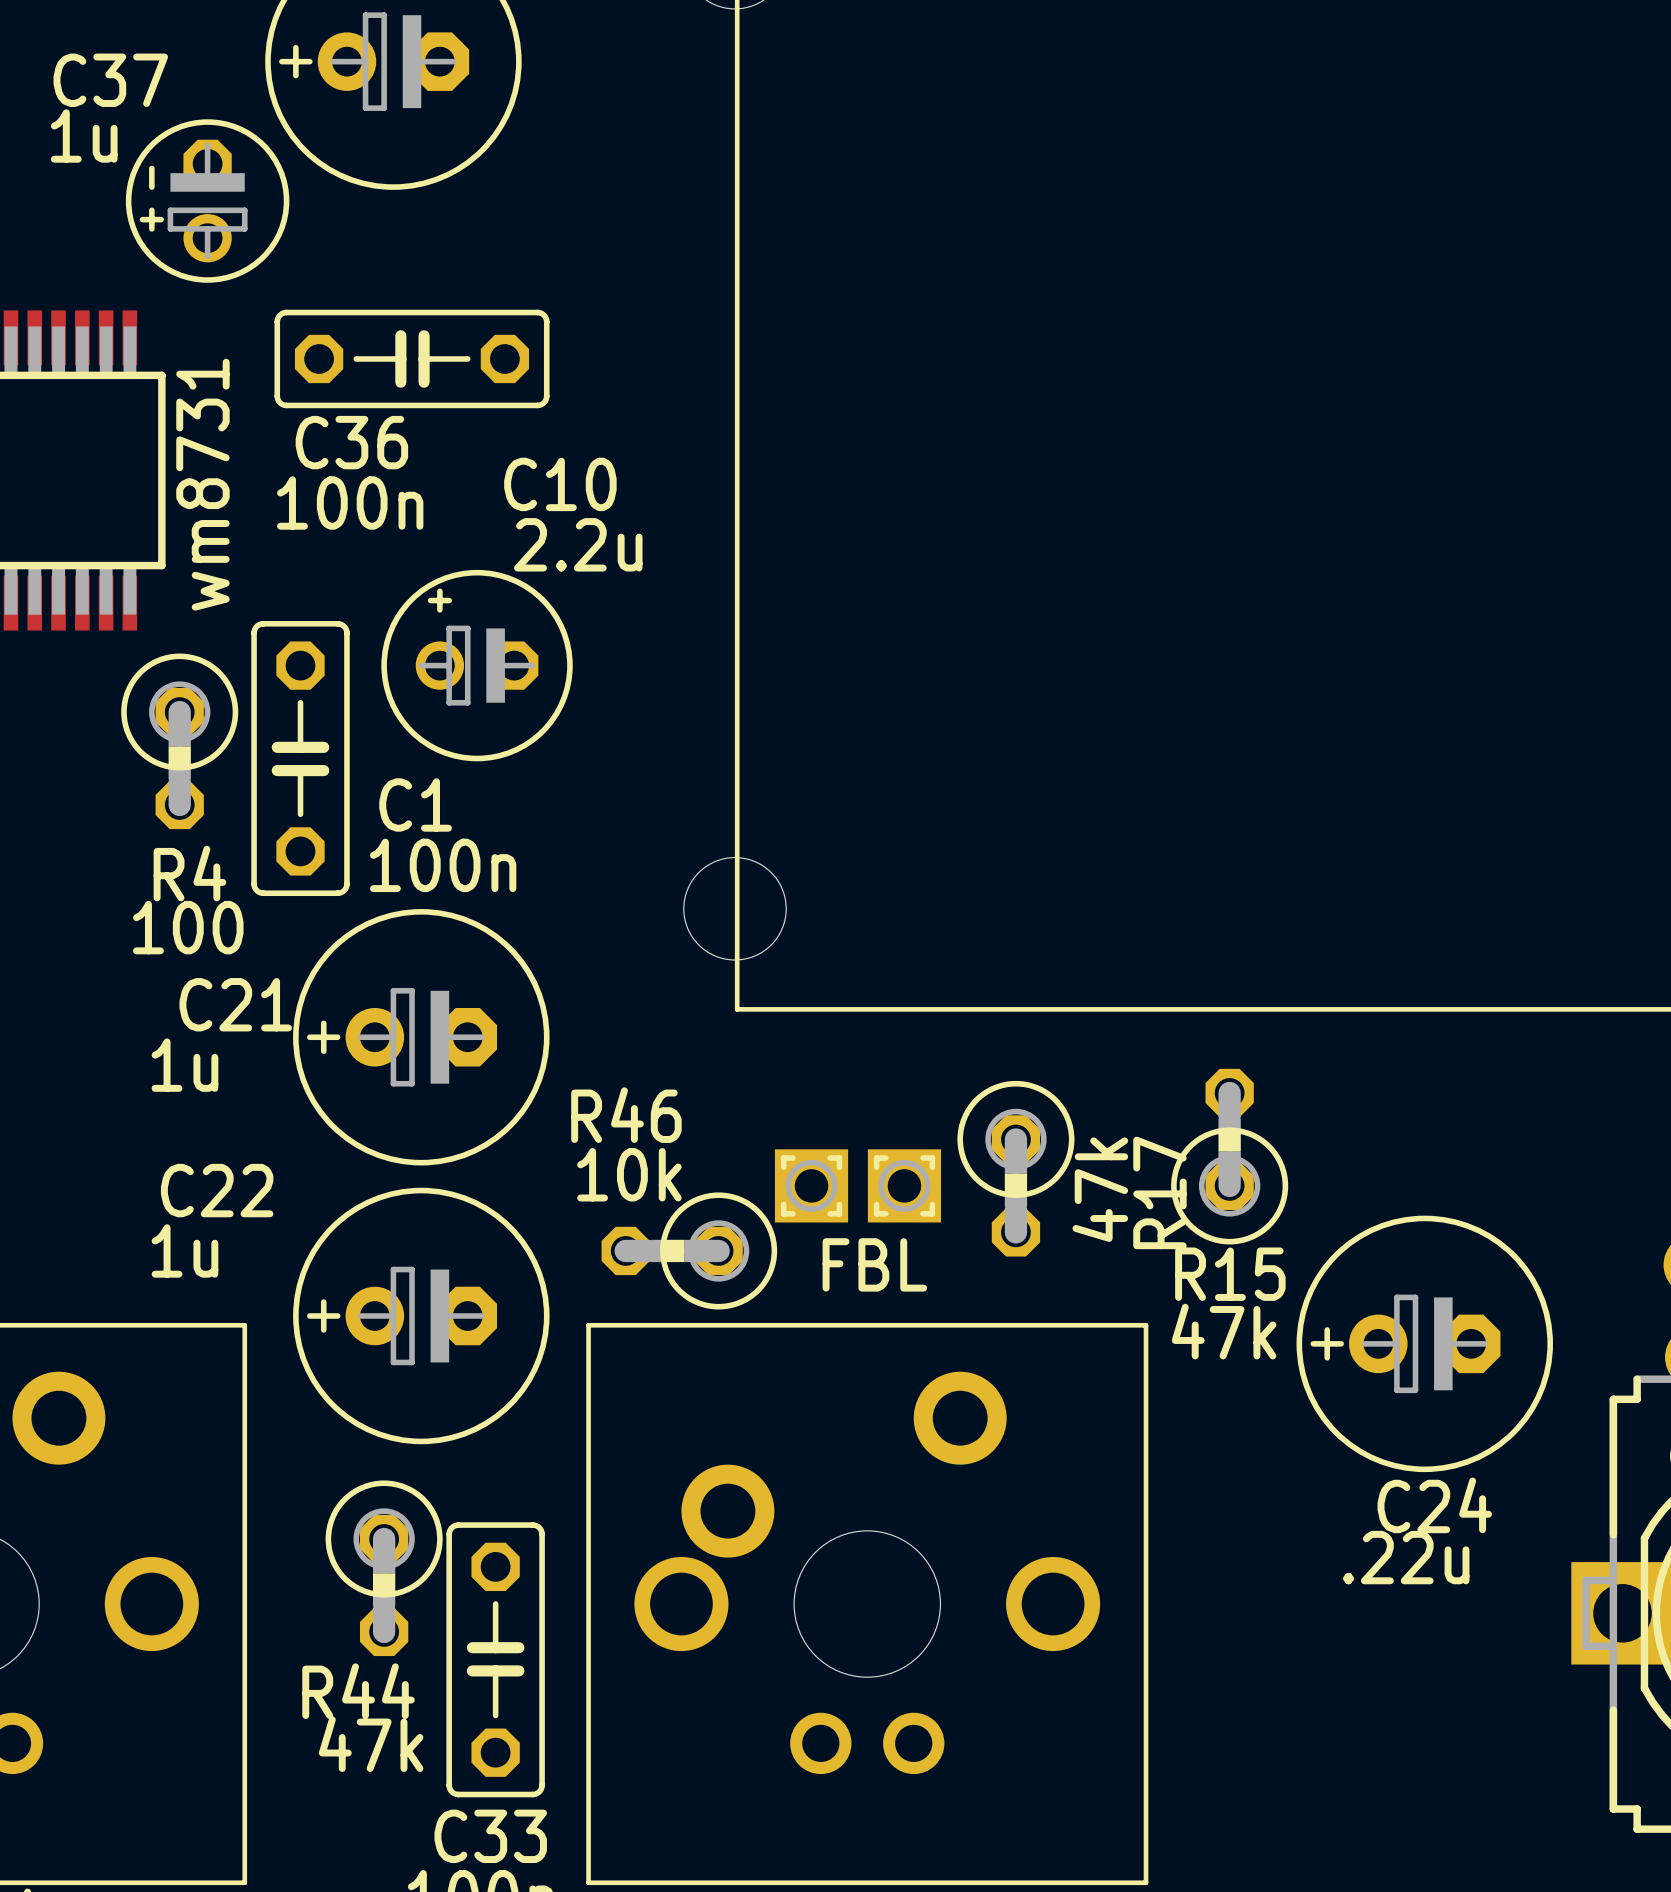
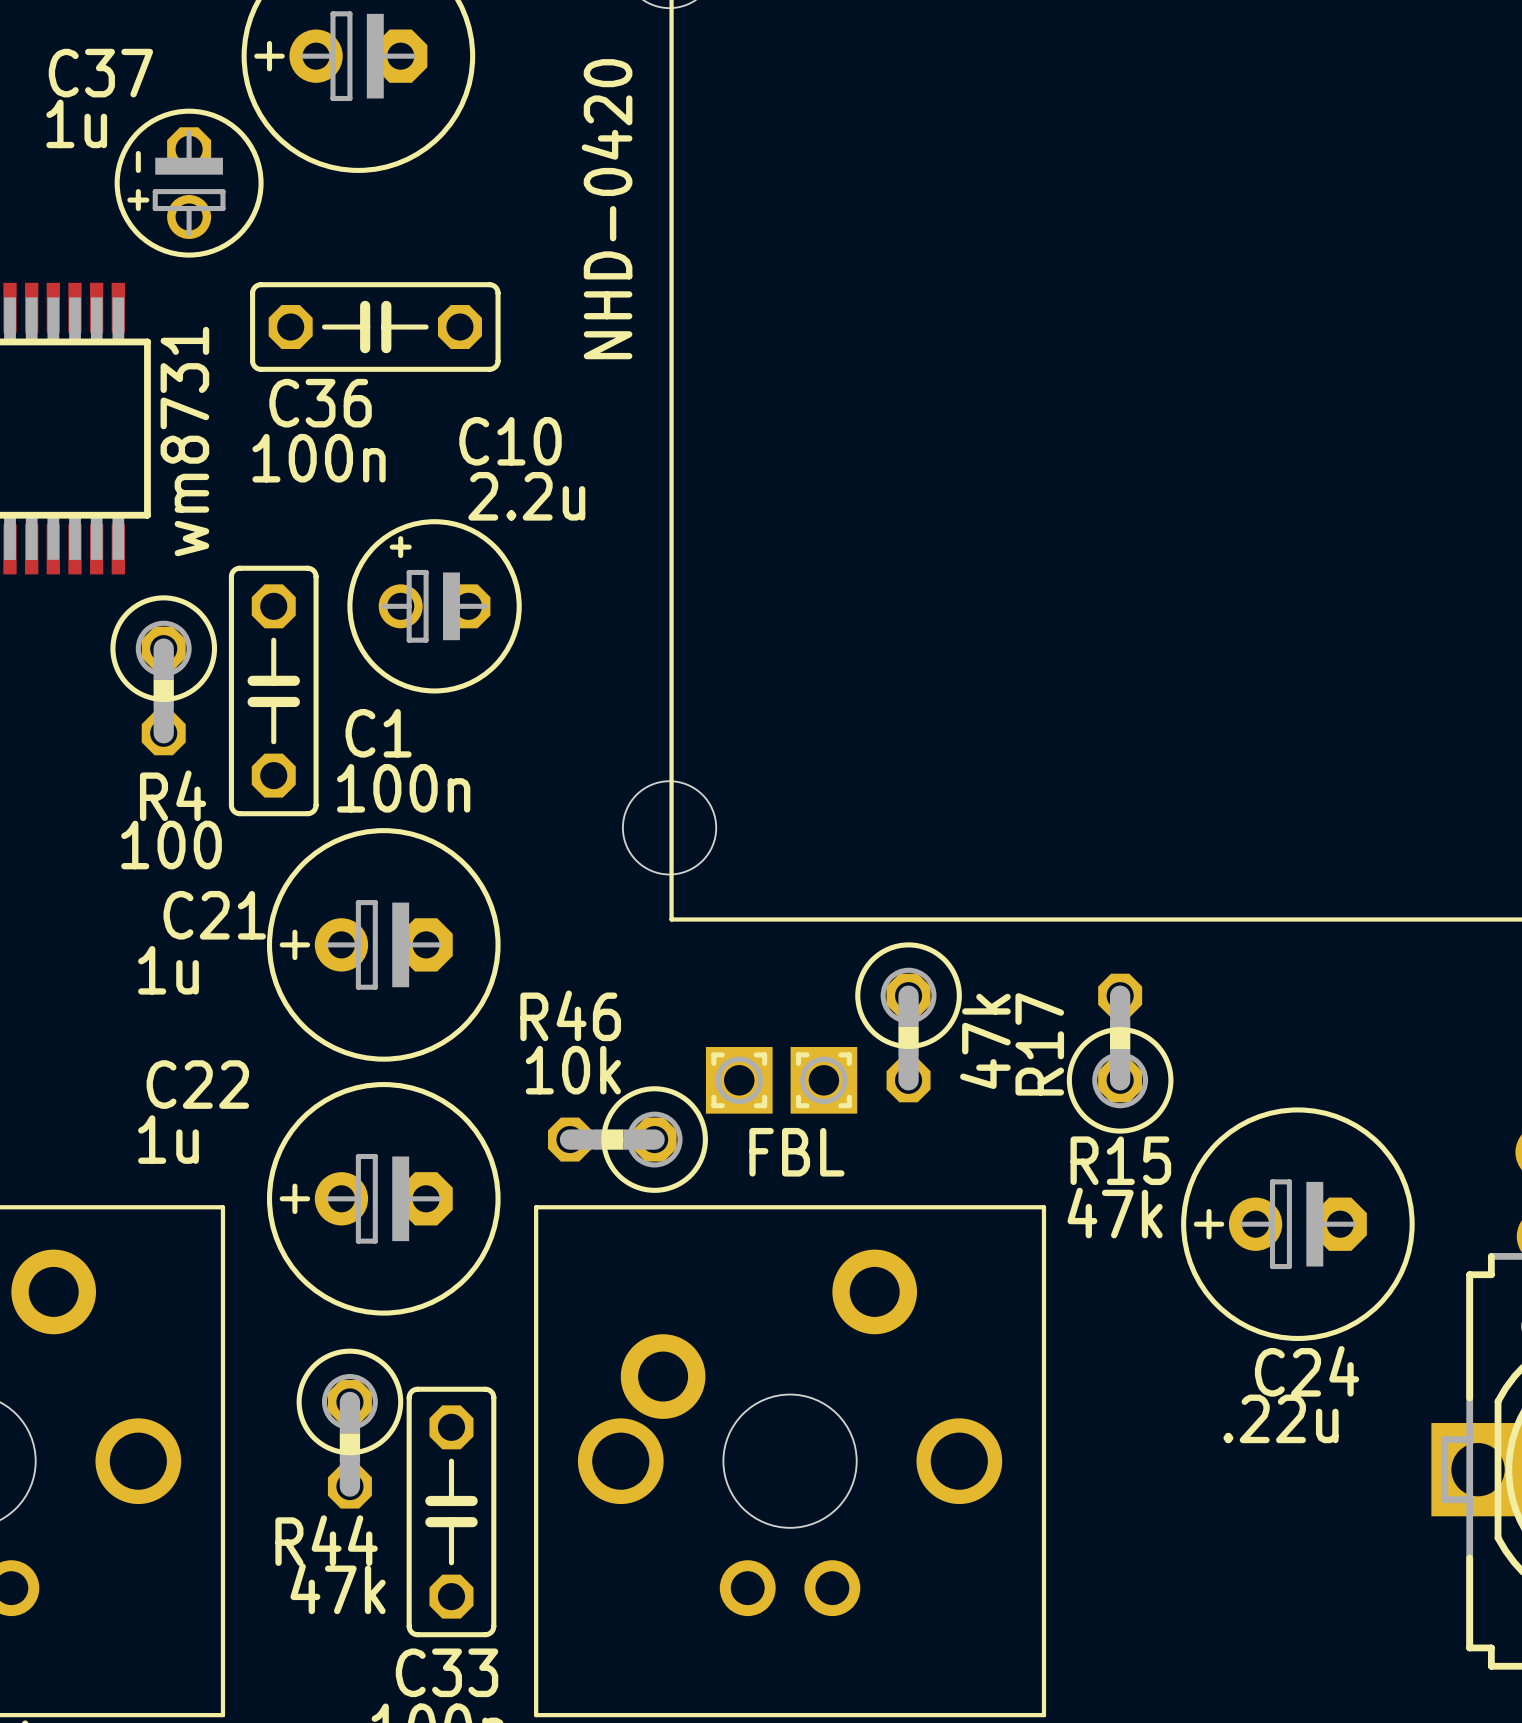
text: none -> NHD-0420 (607, 209)
R17 position: (1015, 1168) -> (908, 1022)

